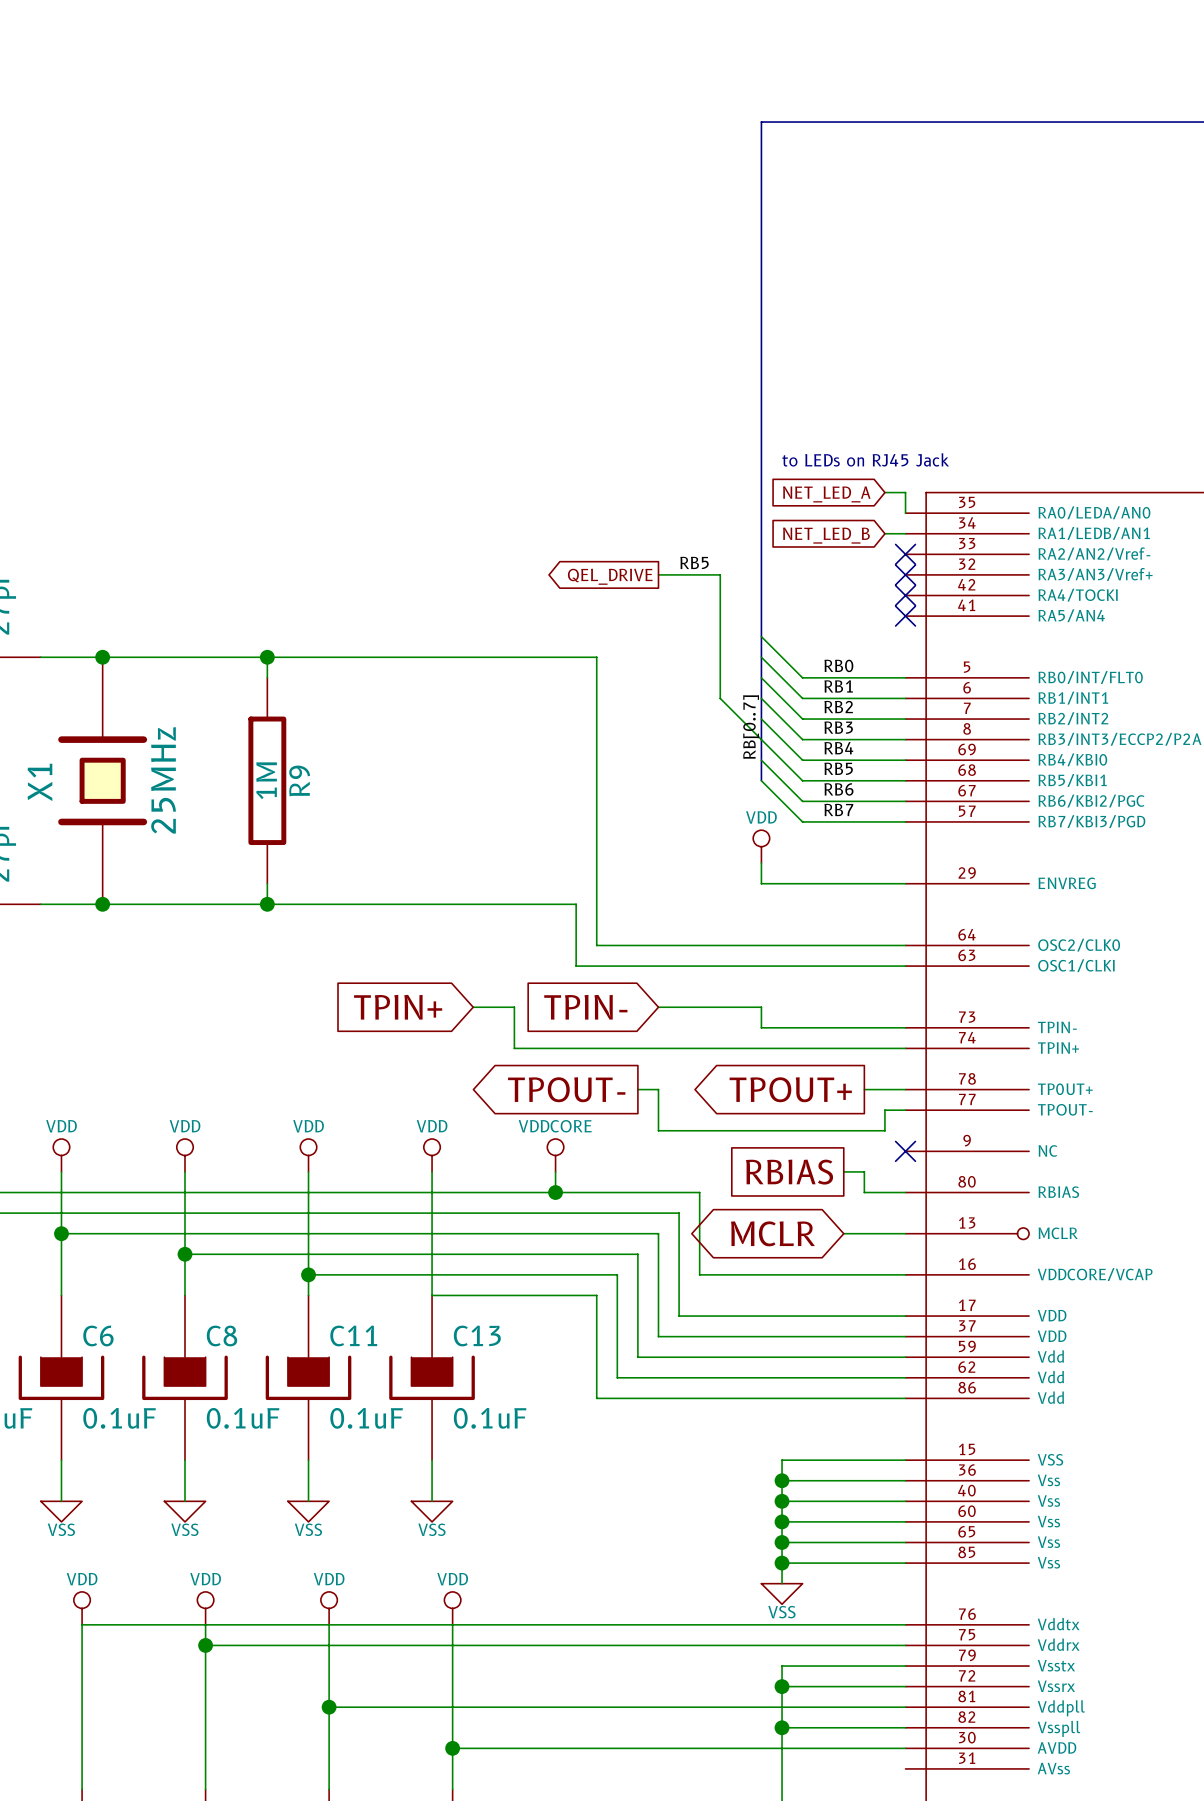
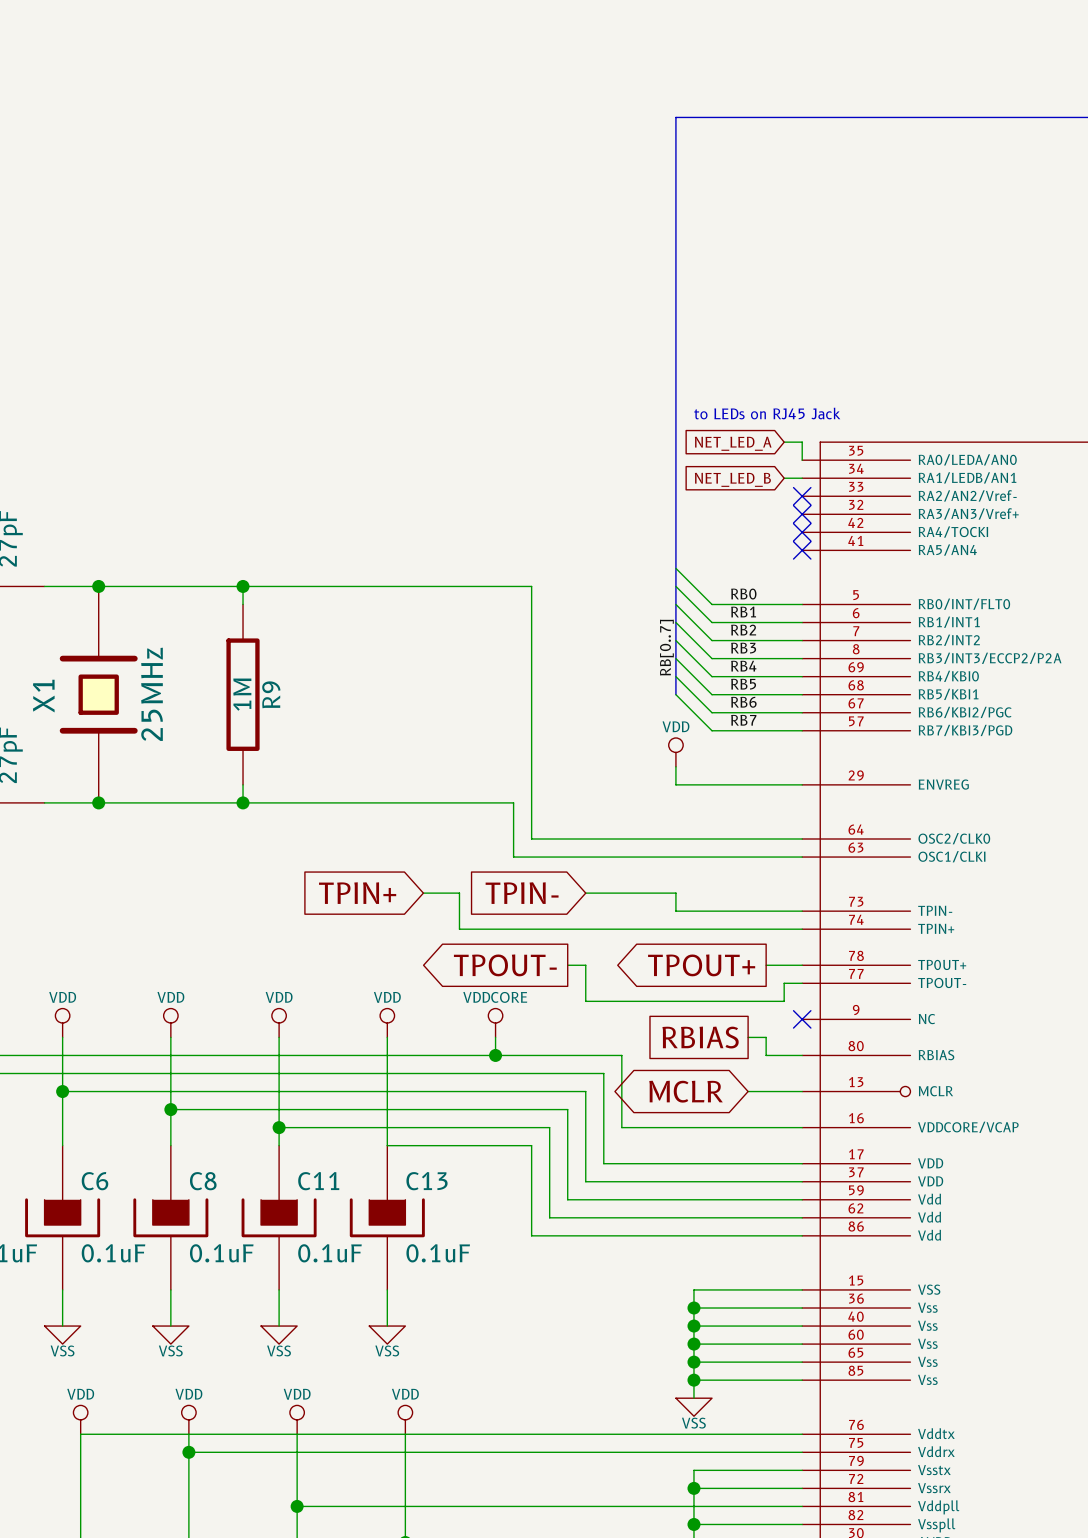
label: RB5 (694, 562) -> none
wire: (658, 574) (720, 574) (720, 698) (761, 739) -> none
global label: QEL_DRIVE (610, 576) -> none

